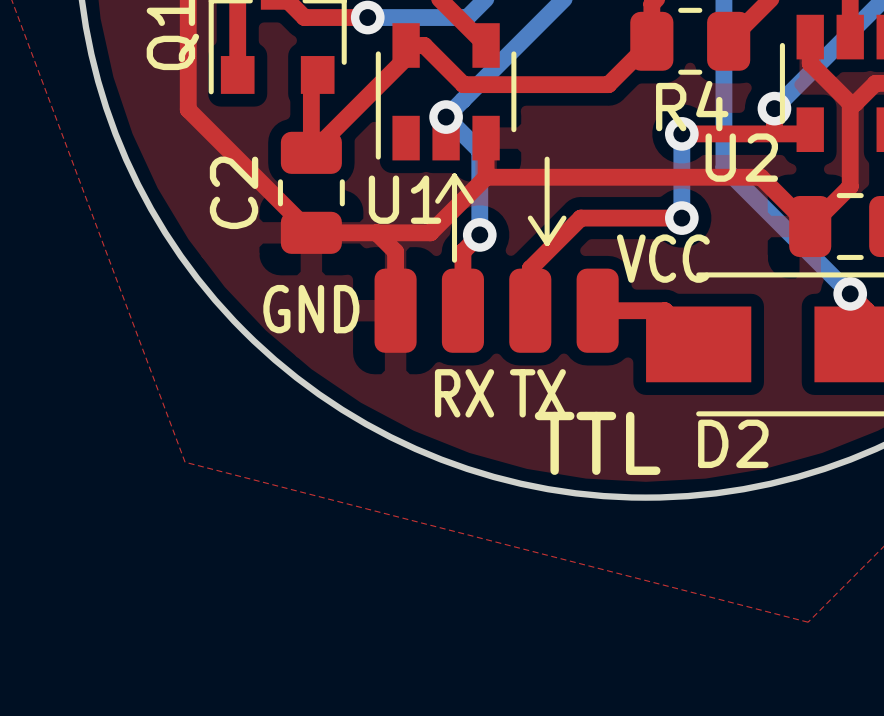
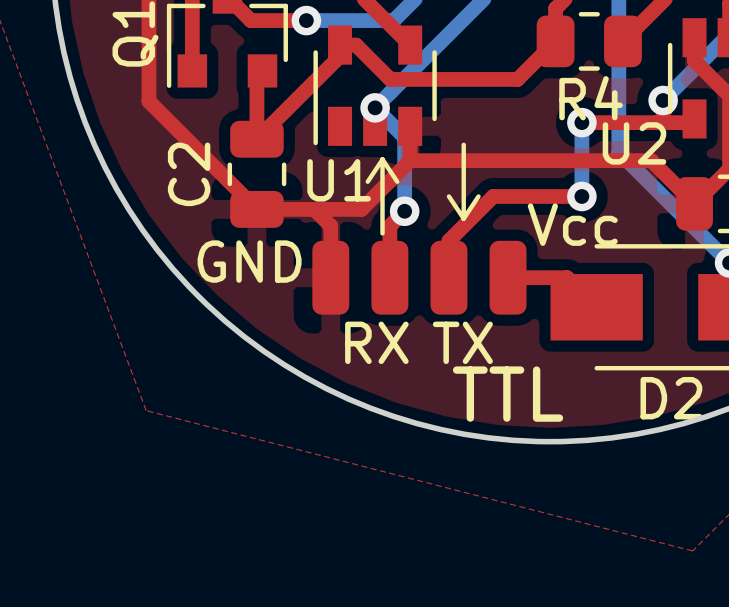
Vcc name: none -> Vcc (572, 224)
text: VCC (663, 258) -> none
GND name: none -> GND (249, 261)
text: GND (311, 309) -> none
RX name: none -> RX (376, 342)
TX name: none -> TX (462, 342)
text: RX (464, 393) -> none
text: TX (537, 393) -> none
D2 name position: D2 (733, 443) -> D2 (671, 398)

